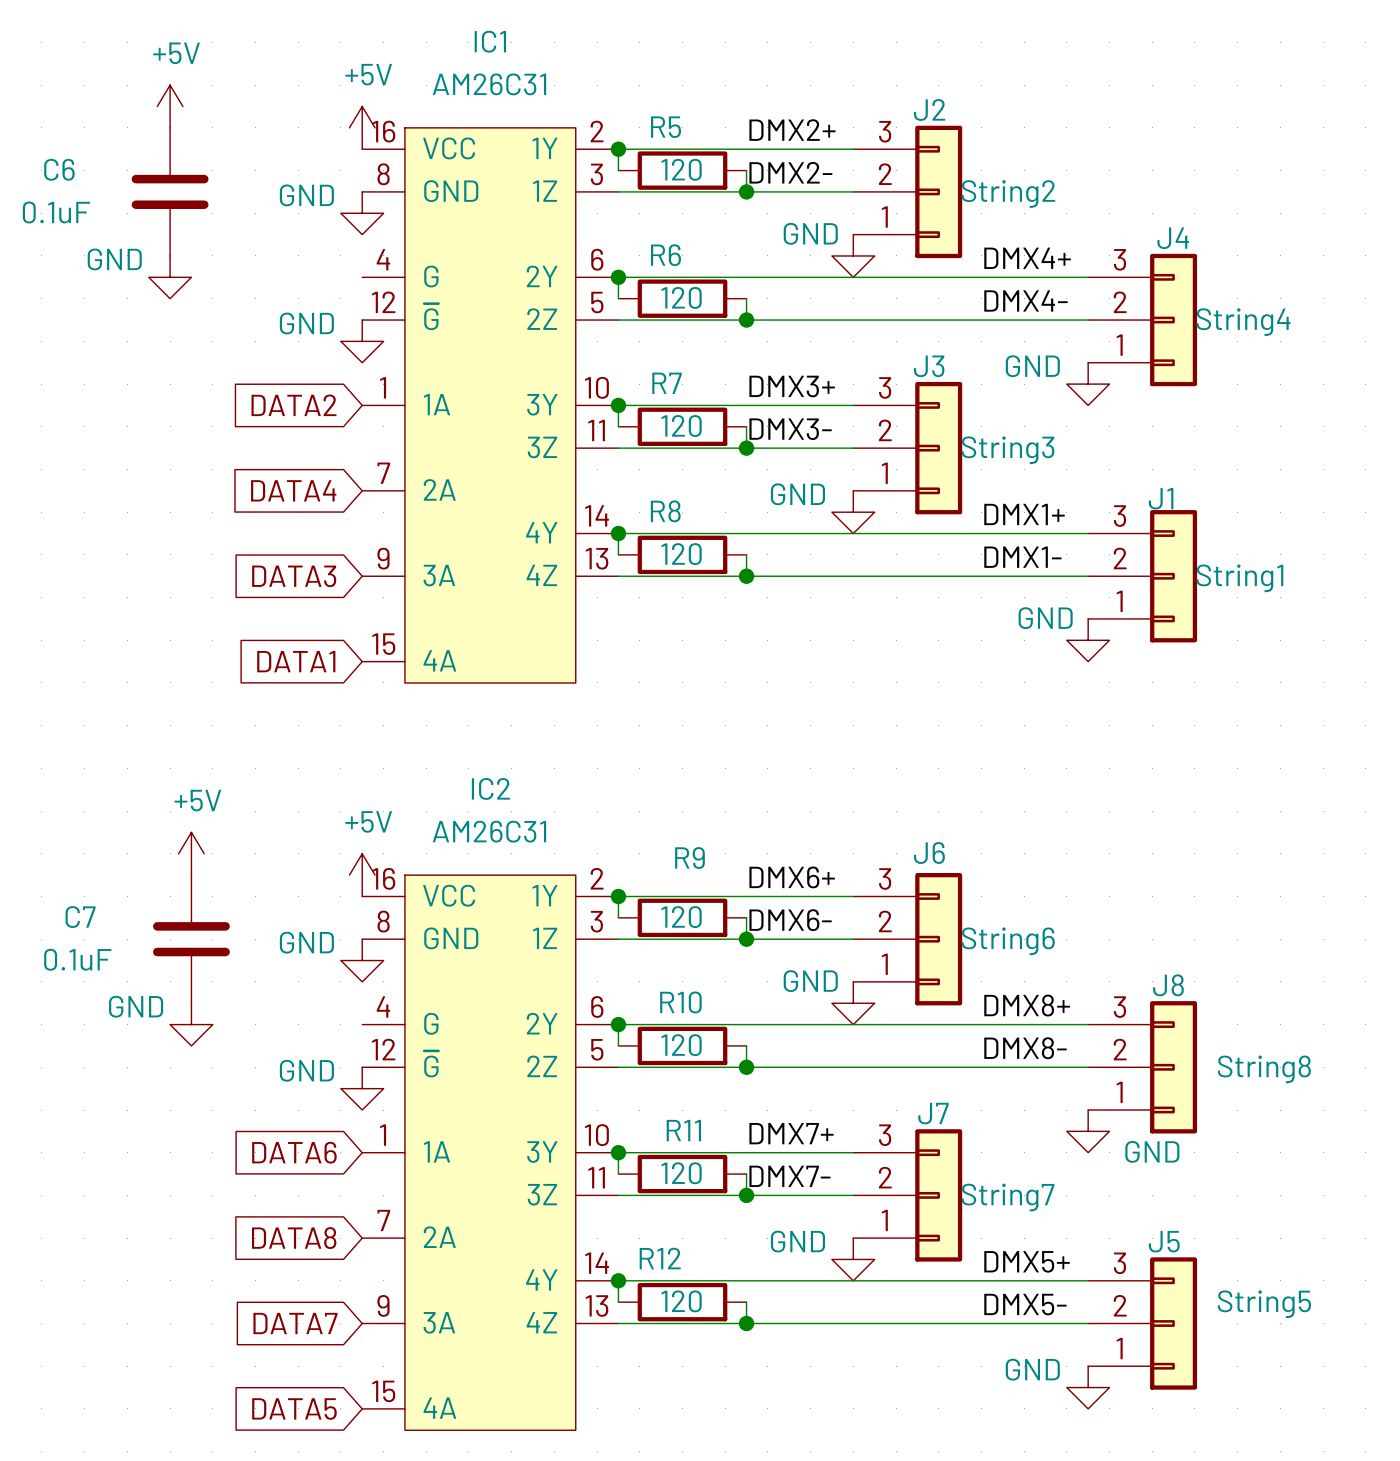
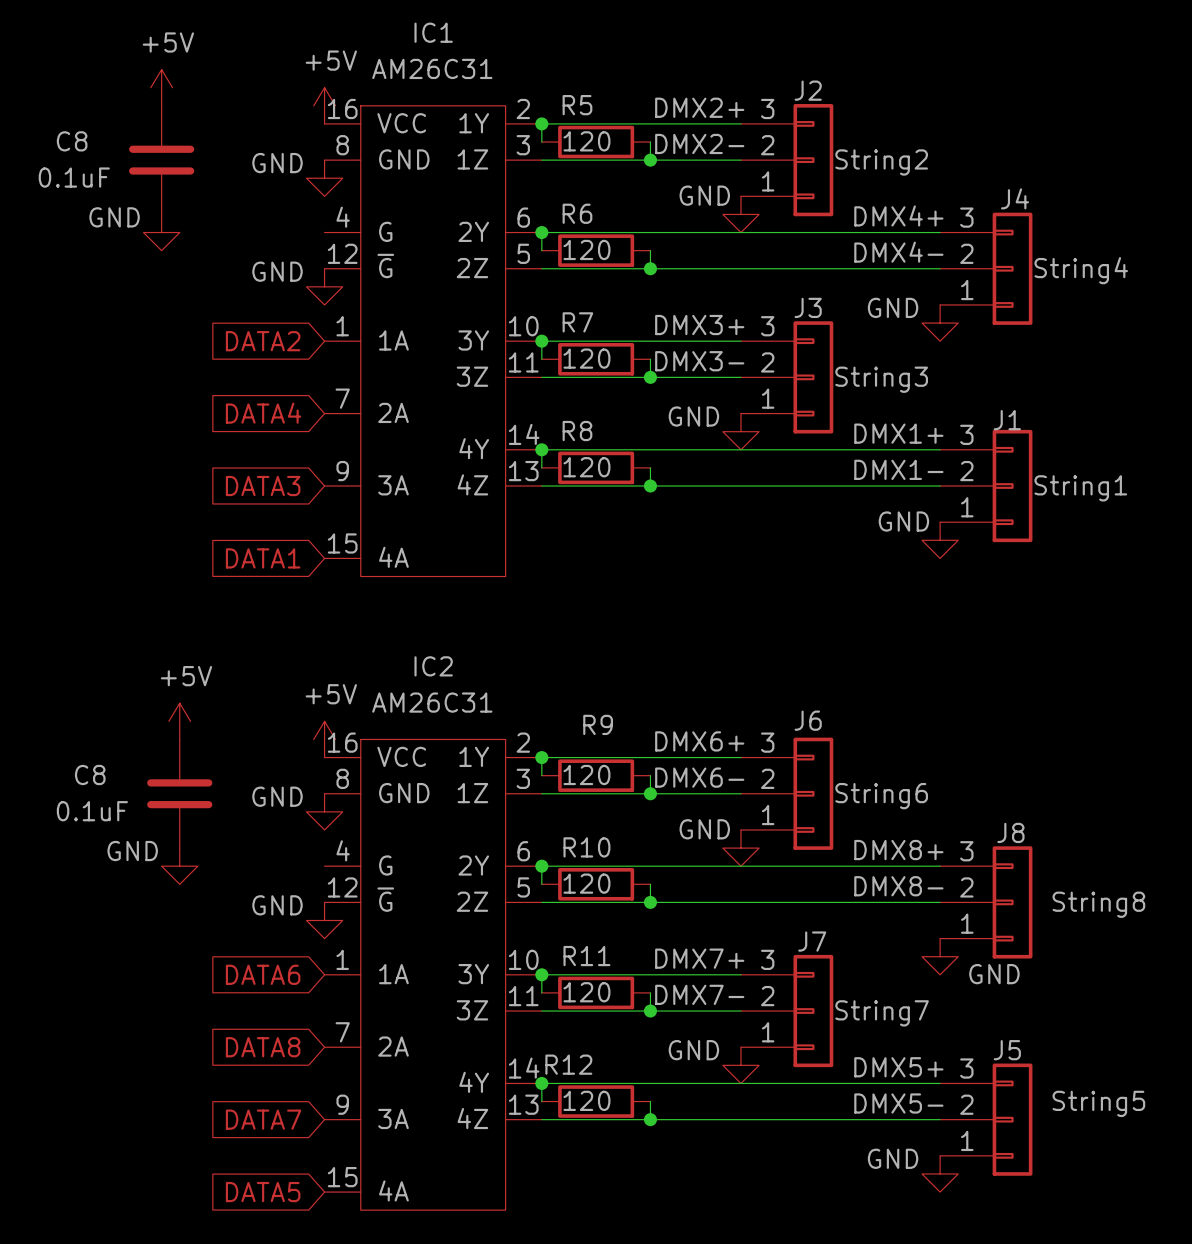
C6 name: C6 (59, 169) -> C8 (72, 141)
C7 name: C7 (80, 917) -> C8 (90, 774)

